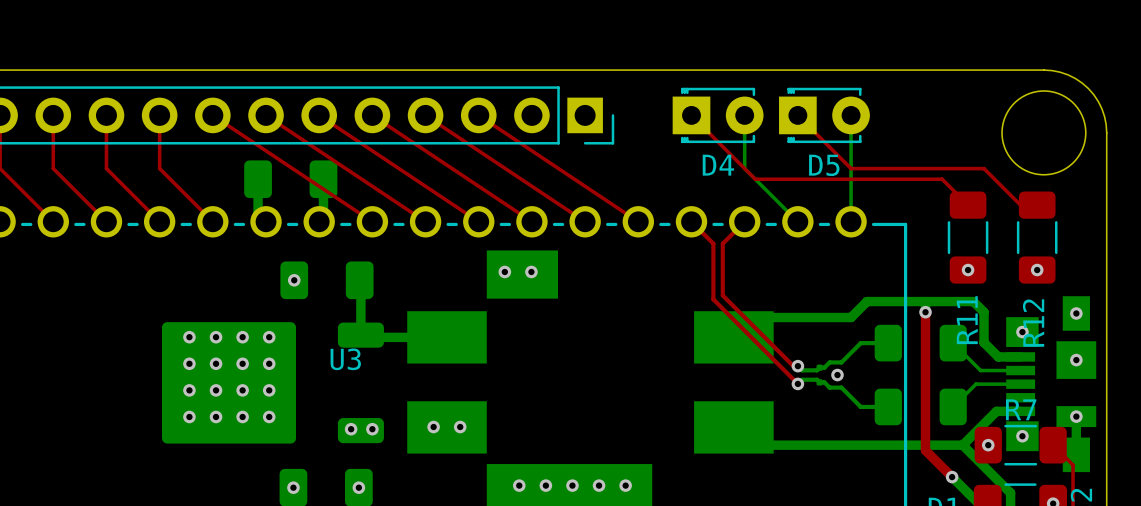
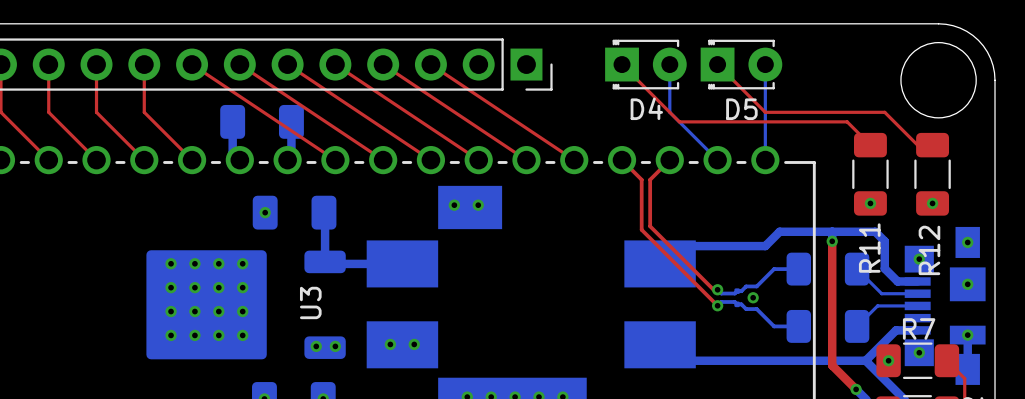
U3 name rotation: 0° (345, 359) -> 90° counterclockwise (310, 302)

